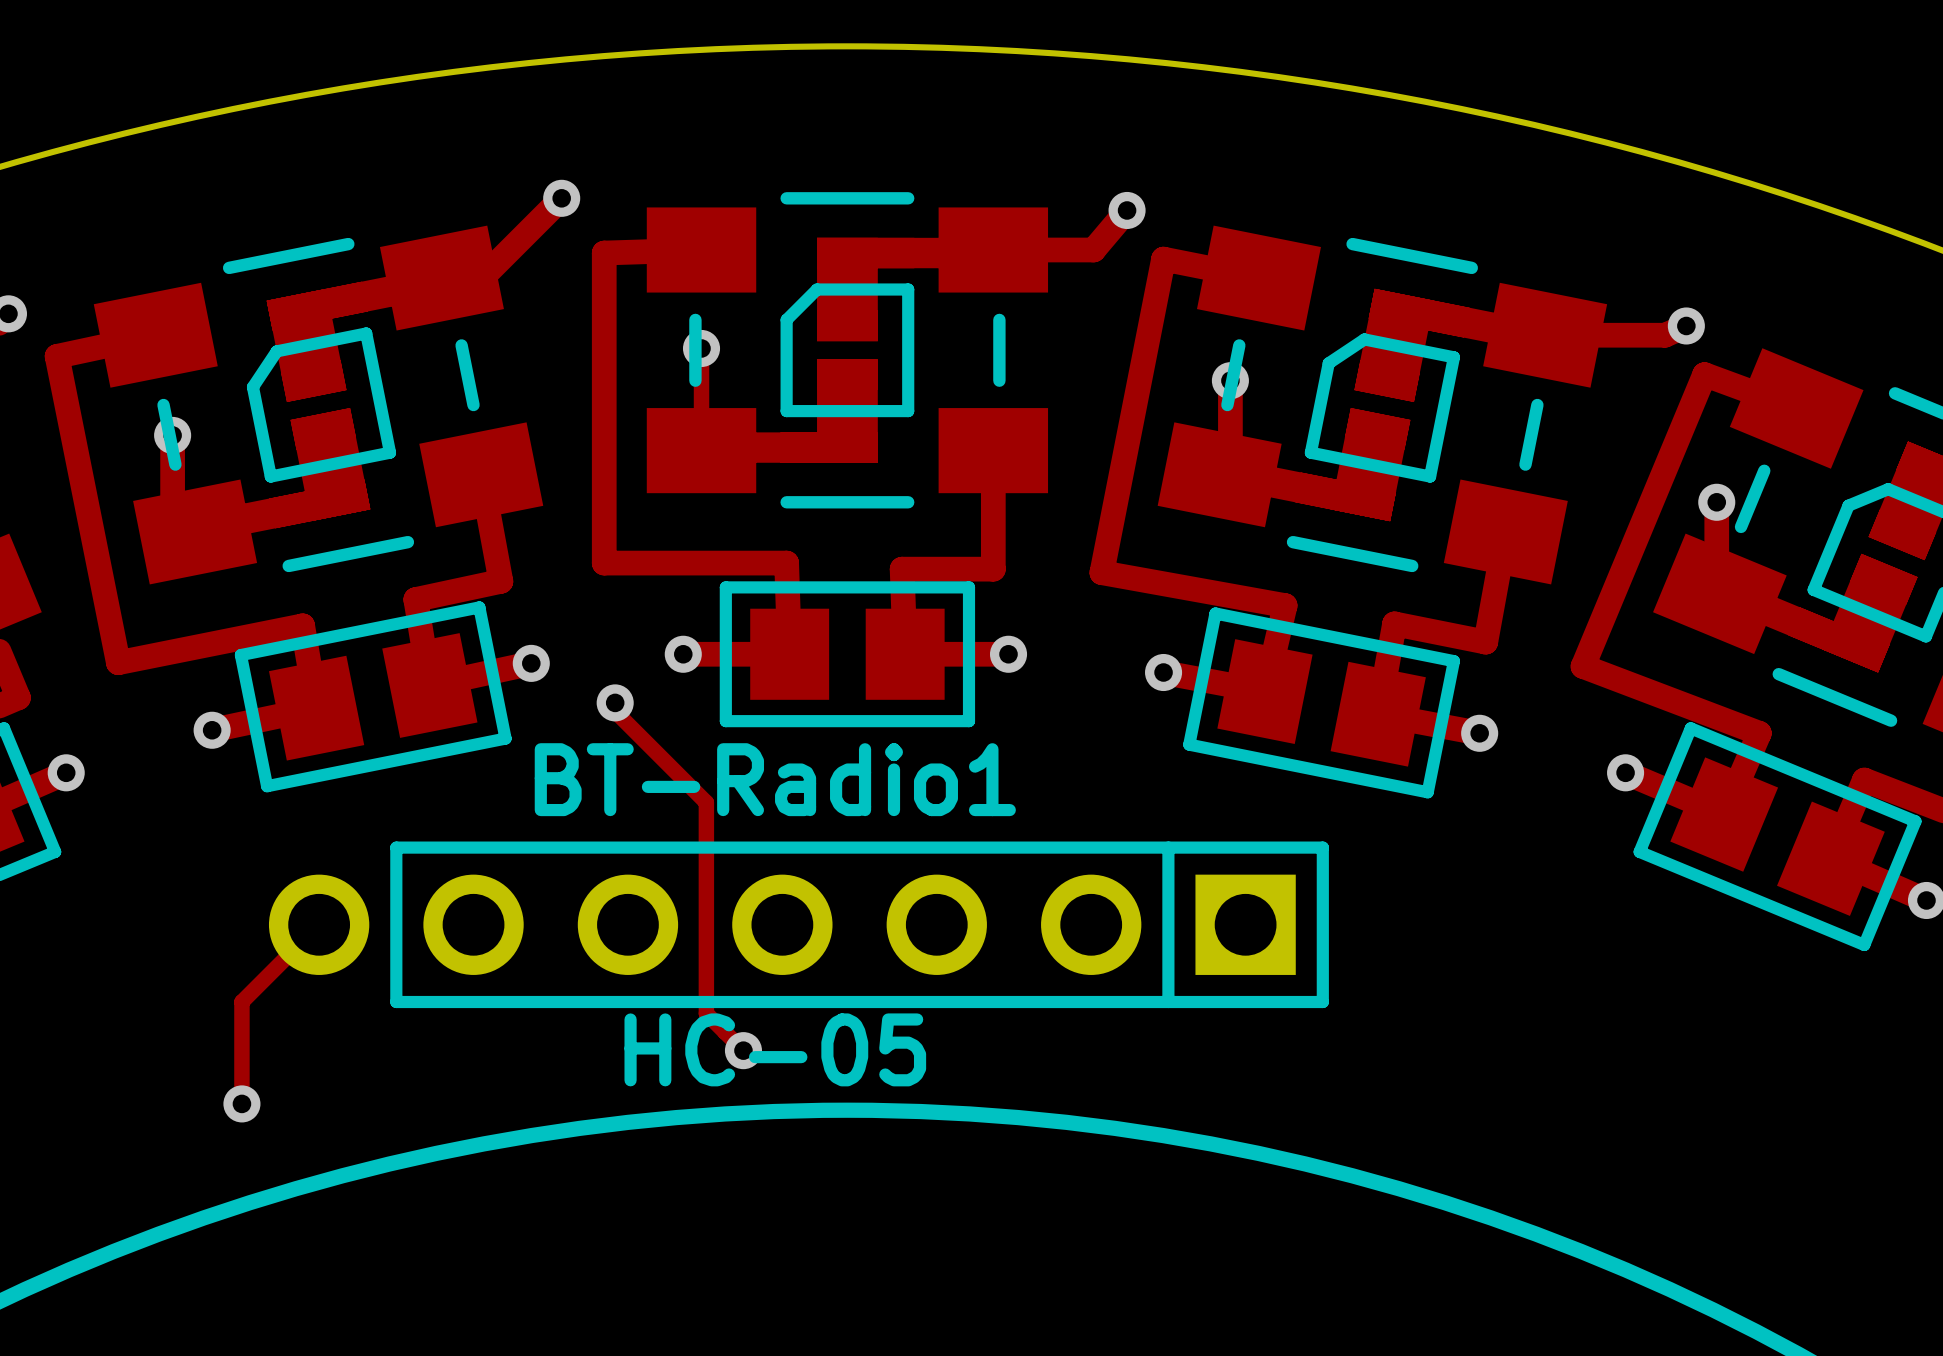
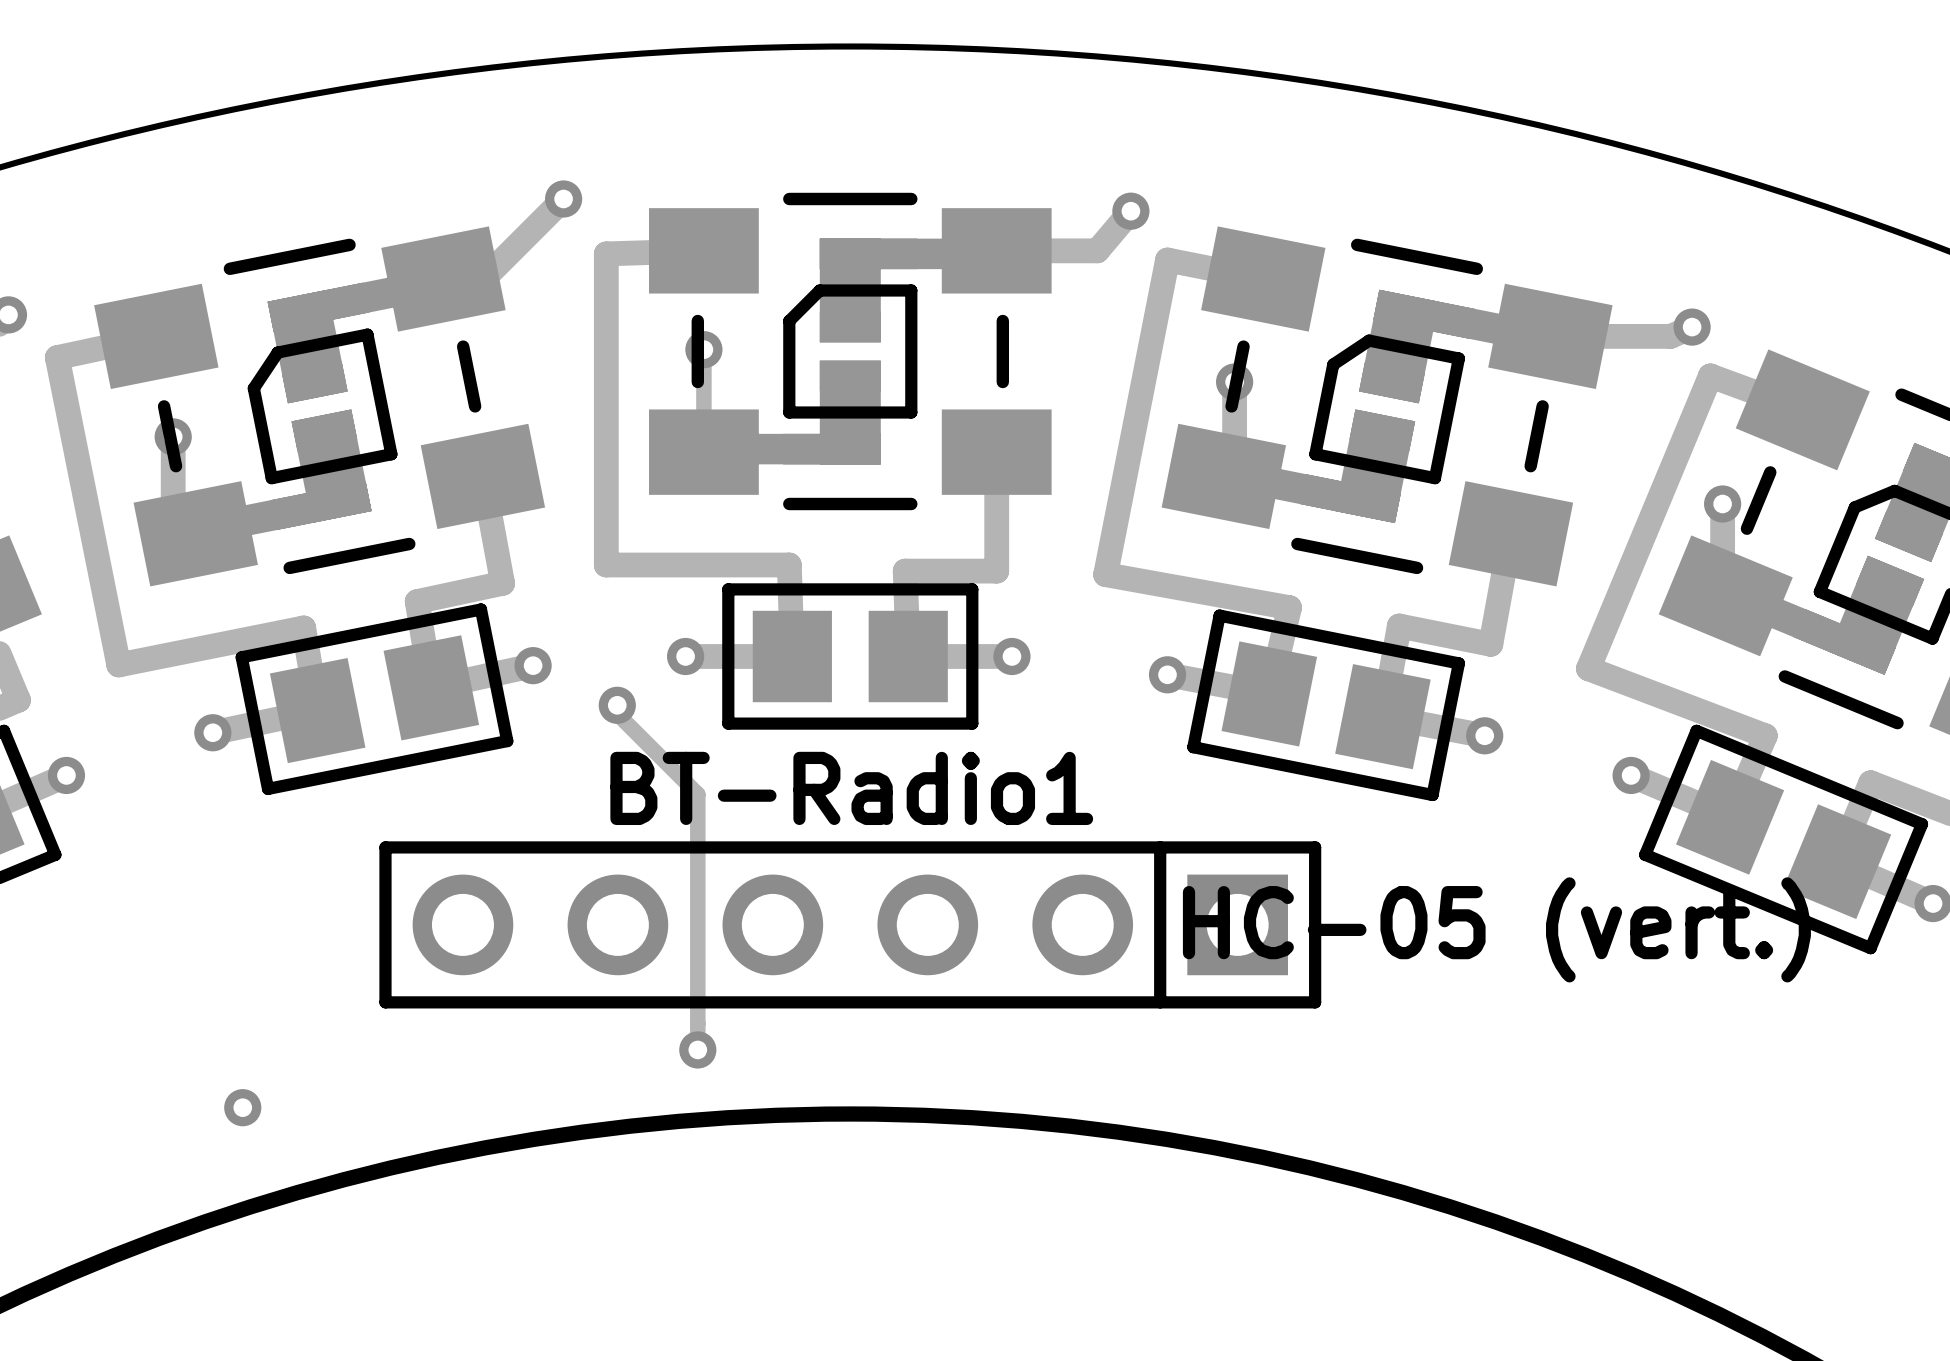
track: (695, 791) (706, 802) (706, 1013) (743, 1050) -> (697, 794) (697, 1049)
BT-Radio1 footprint: [268, 841, 1329, 1009] -> [379, 841, 1322, 1009]
track: (319, 924) (241, 1001) (241, 1103) -> none
BT-Radio1 value: HC-05 (775, 1049) -> HC-05 (vert.) (1496, 929)
via position: (743, 1050) -> (697, 1049)

